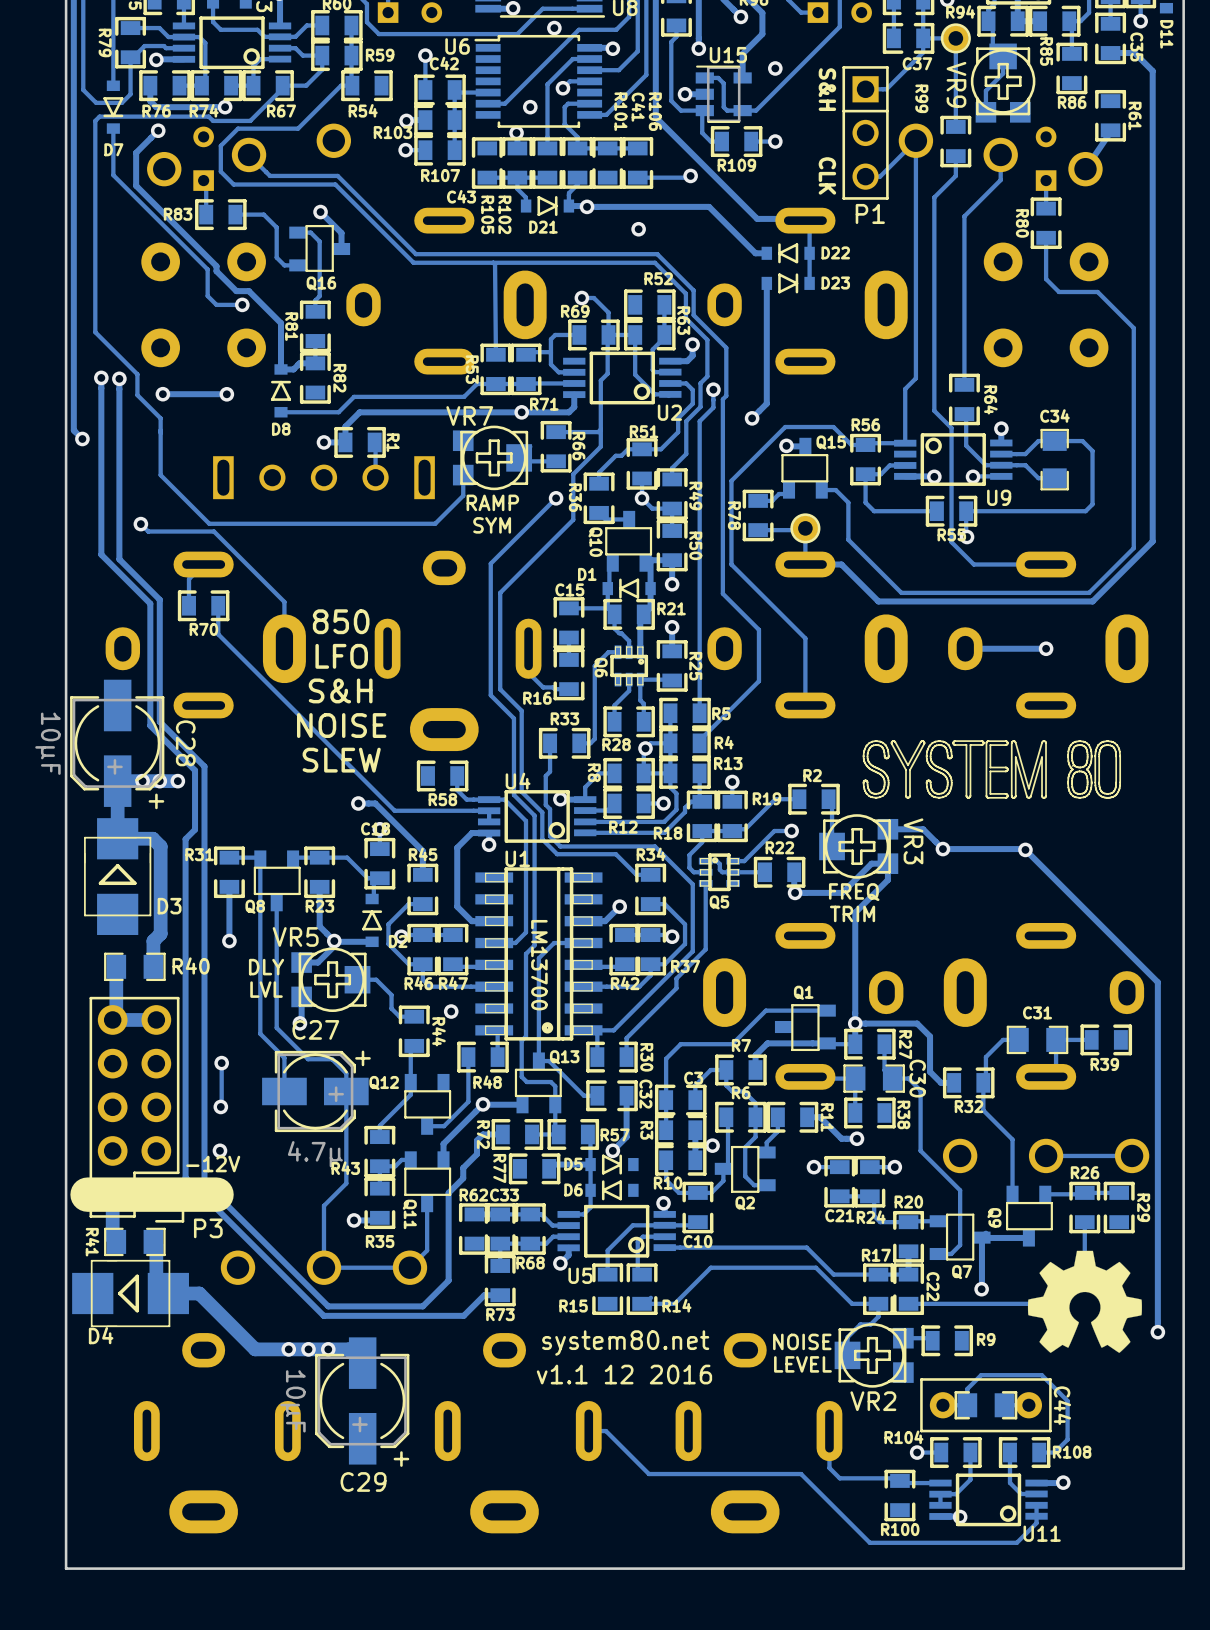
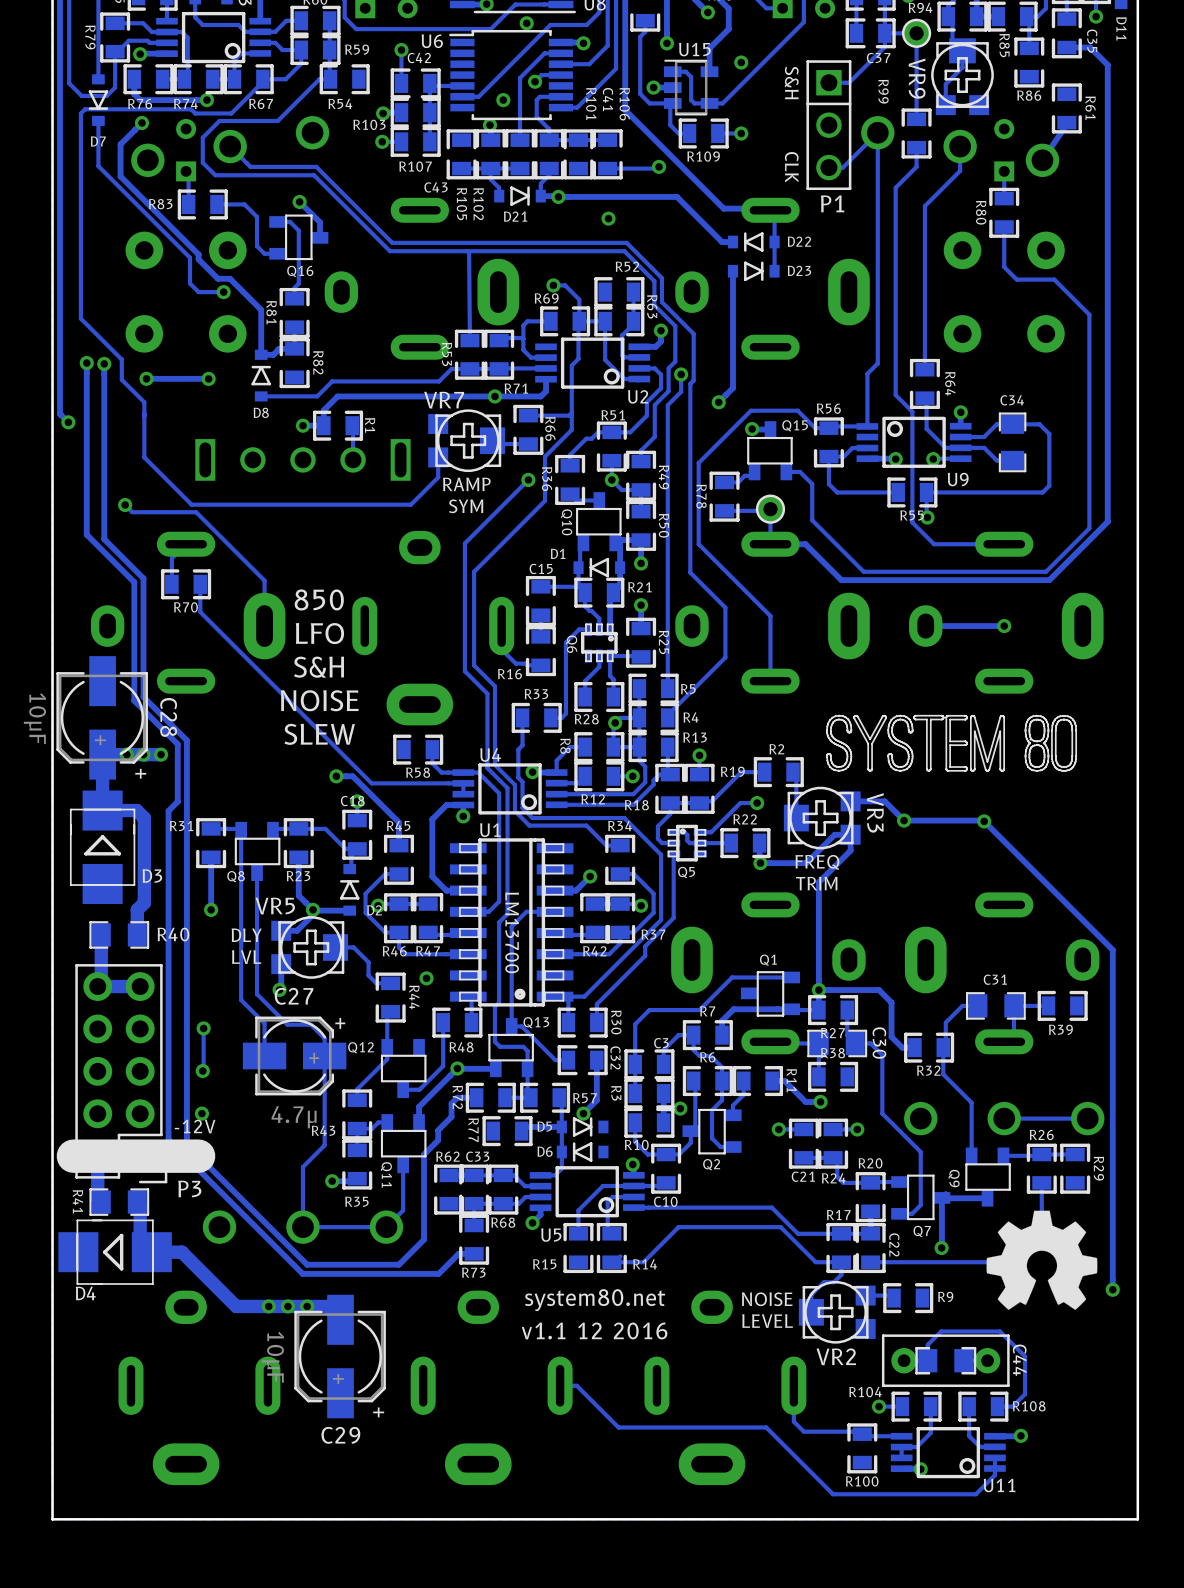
R27 name rotation: 0° (905, 1044) -> 90° counterclockwise (832, 1033)
R27 name position: R27 (905, 1044) -> R27 (832, 1033)
R38 name rotation: 0° (903, 1114) -> 90° counterclockwise (833, 1053)
R38 name position: R38 (903, 1114) -> R38 (833, 1053)

